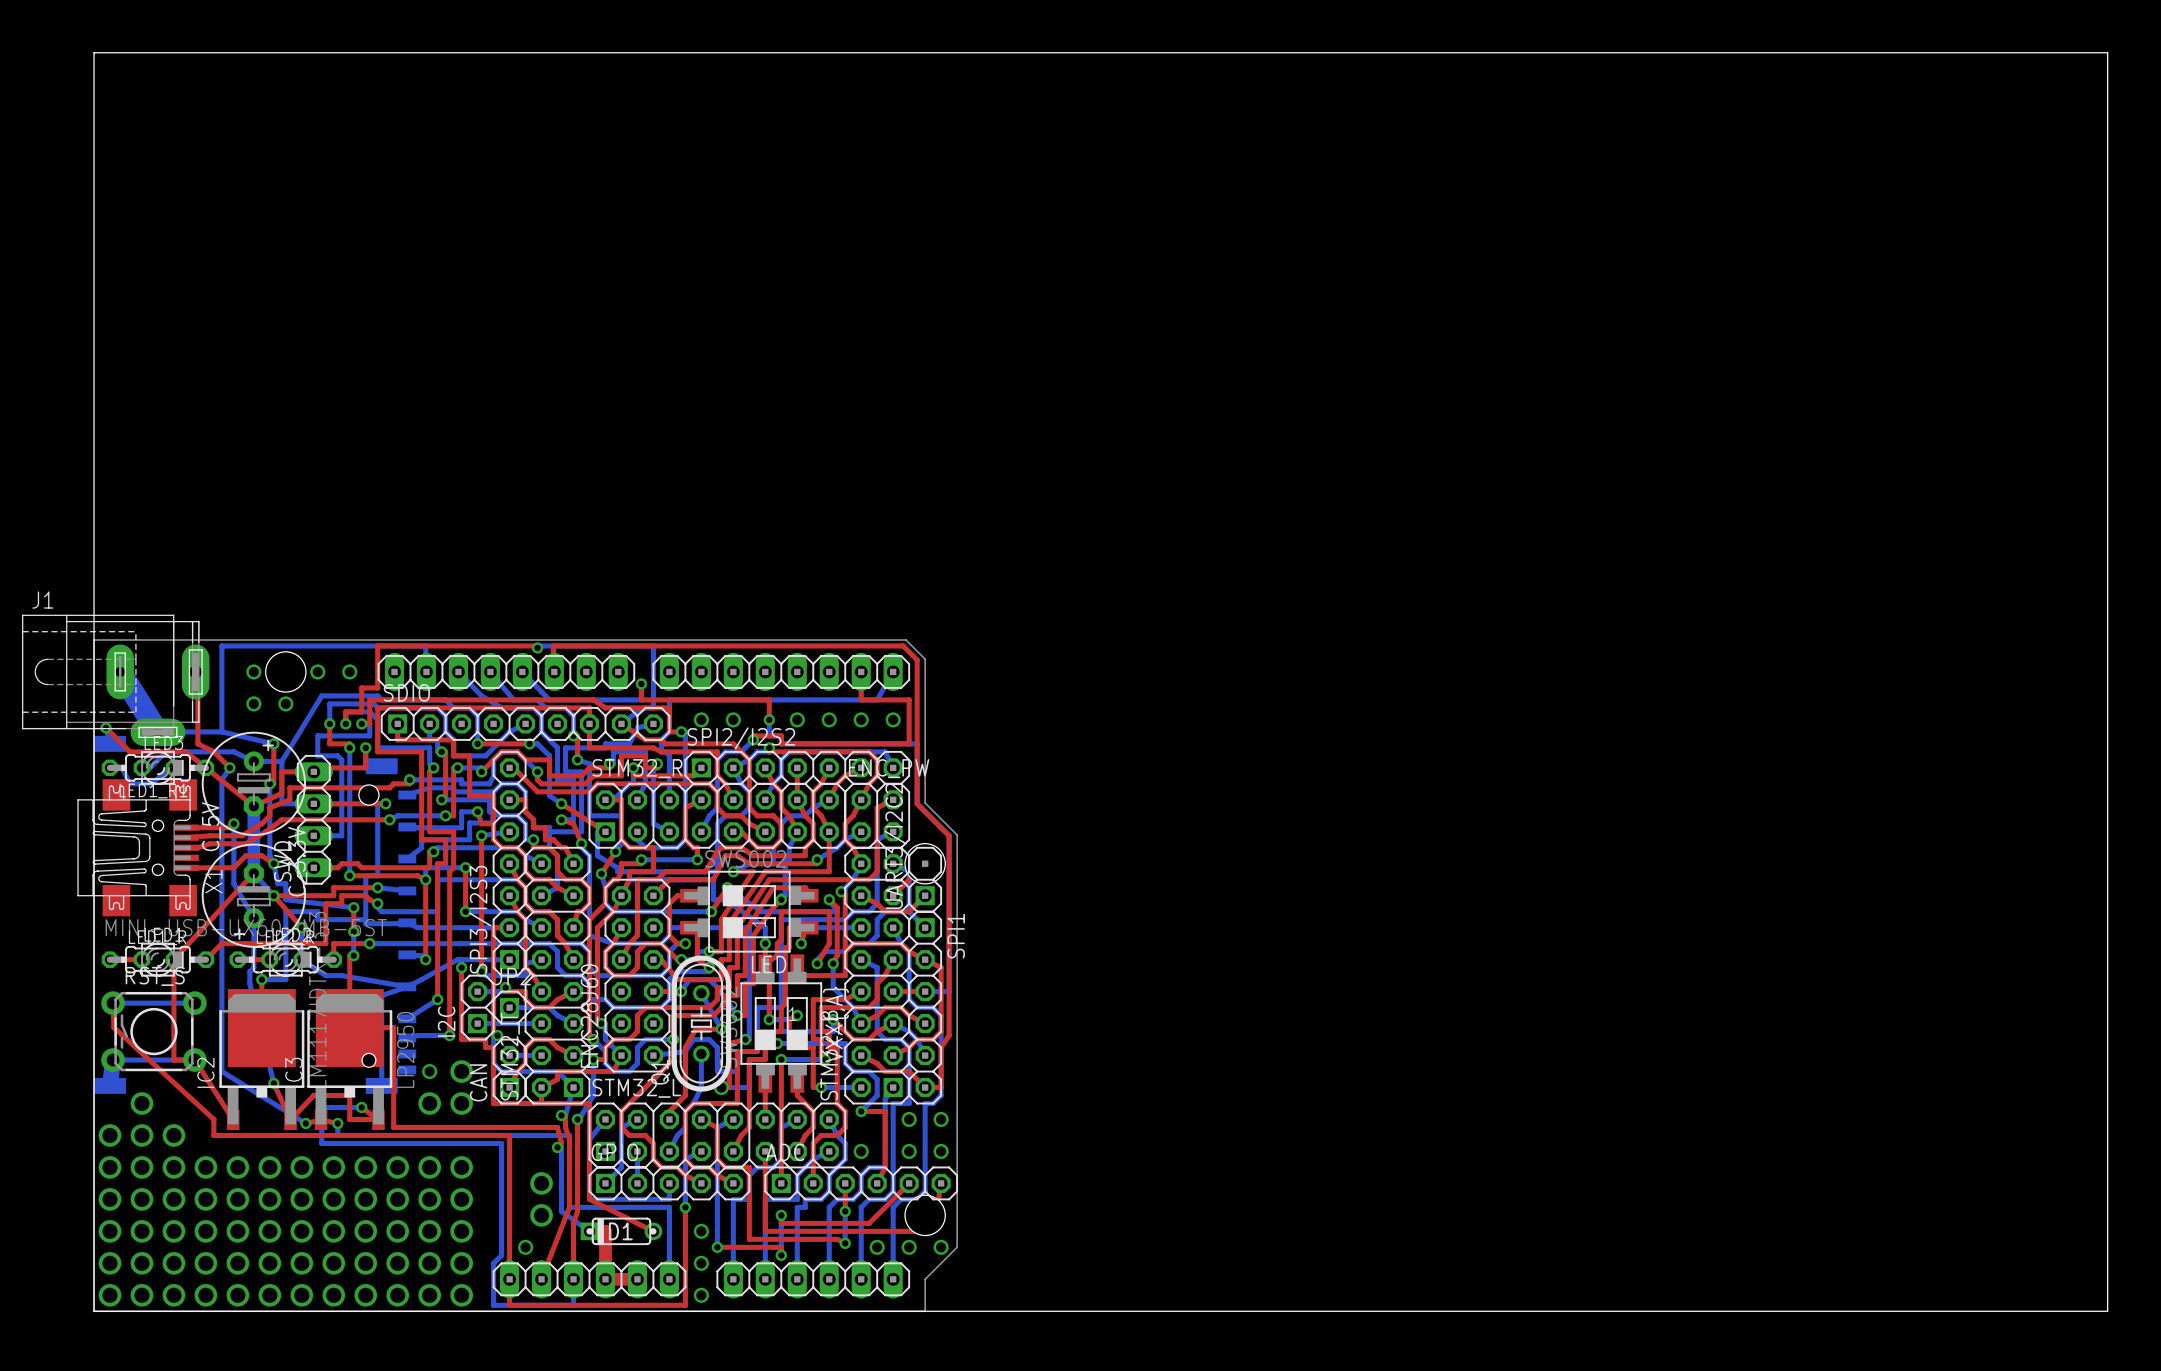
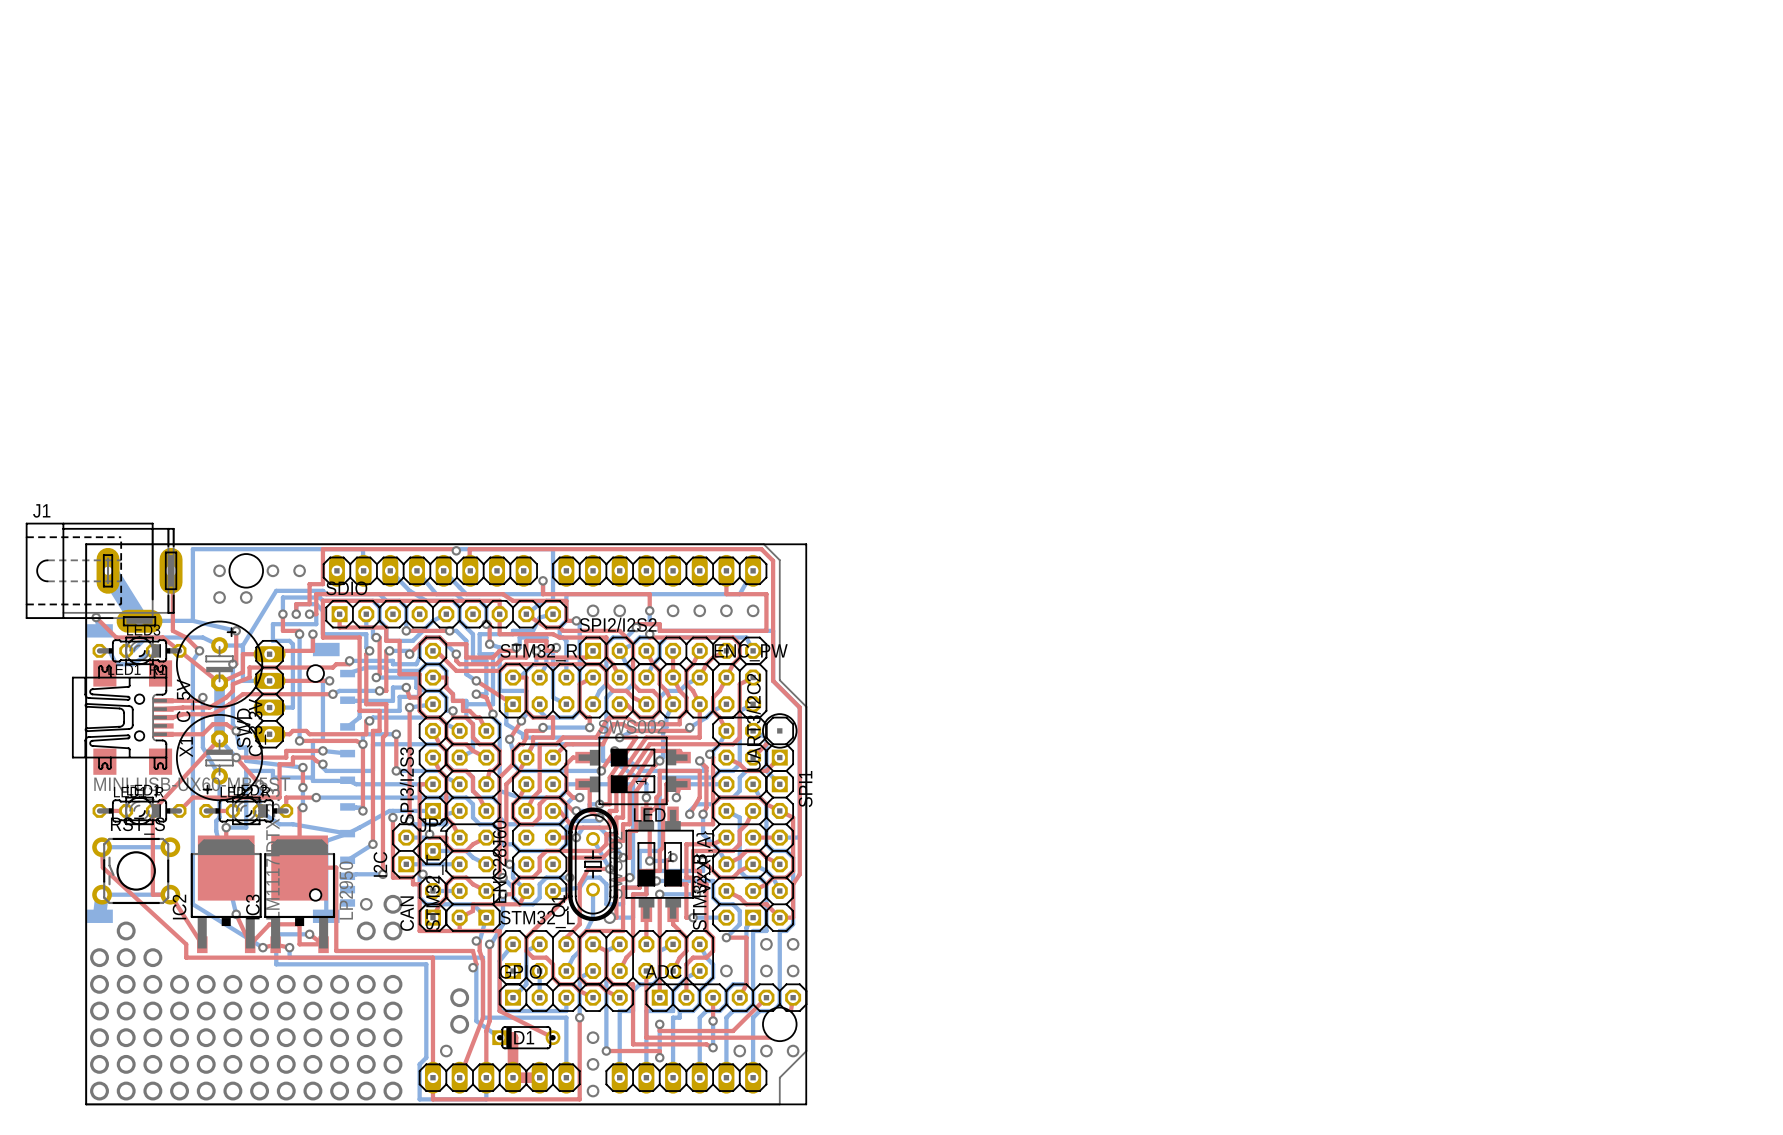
board edge: (94, 640) (94, 52) (2107, 52) (2107, 1311) (956, 1311) -> (86, 544) (806, 544) (806, 1104)

